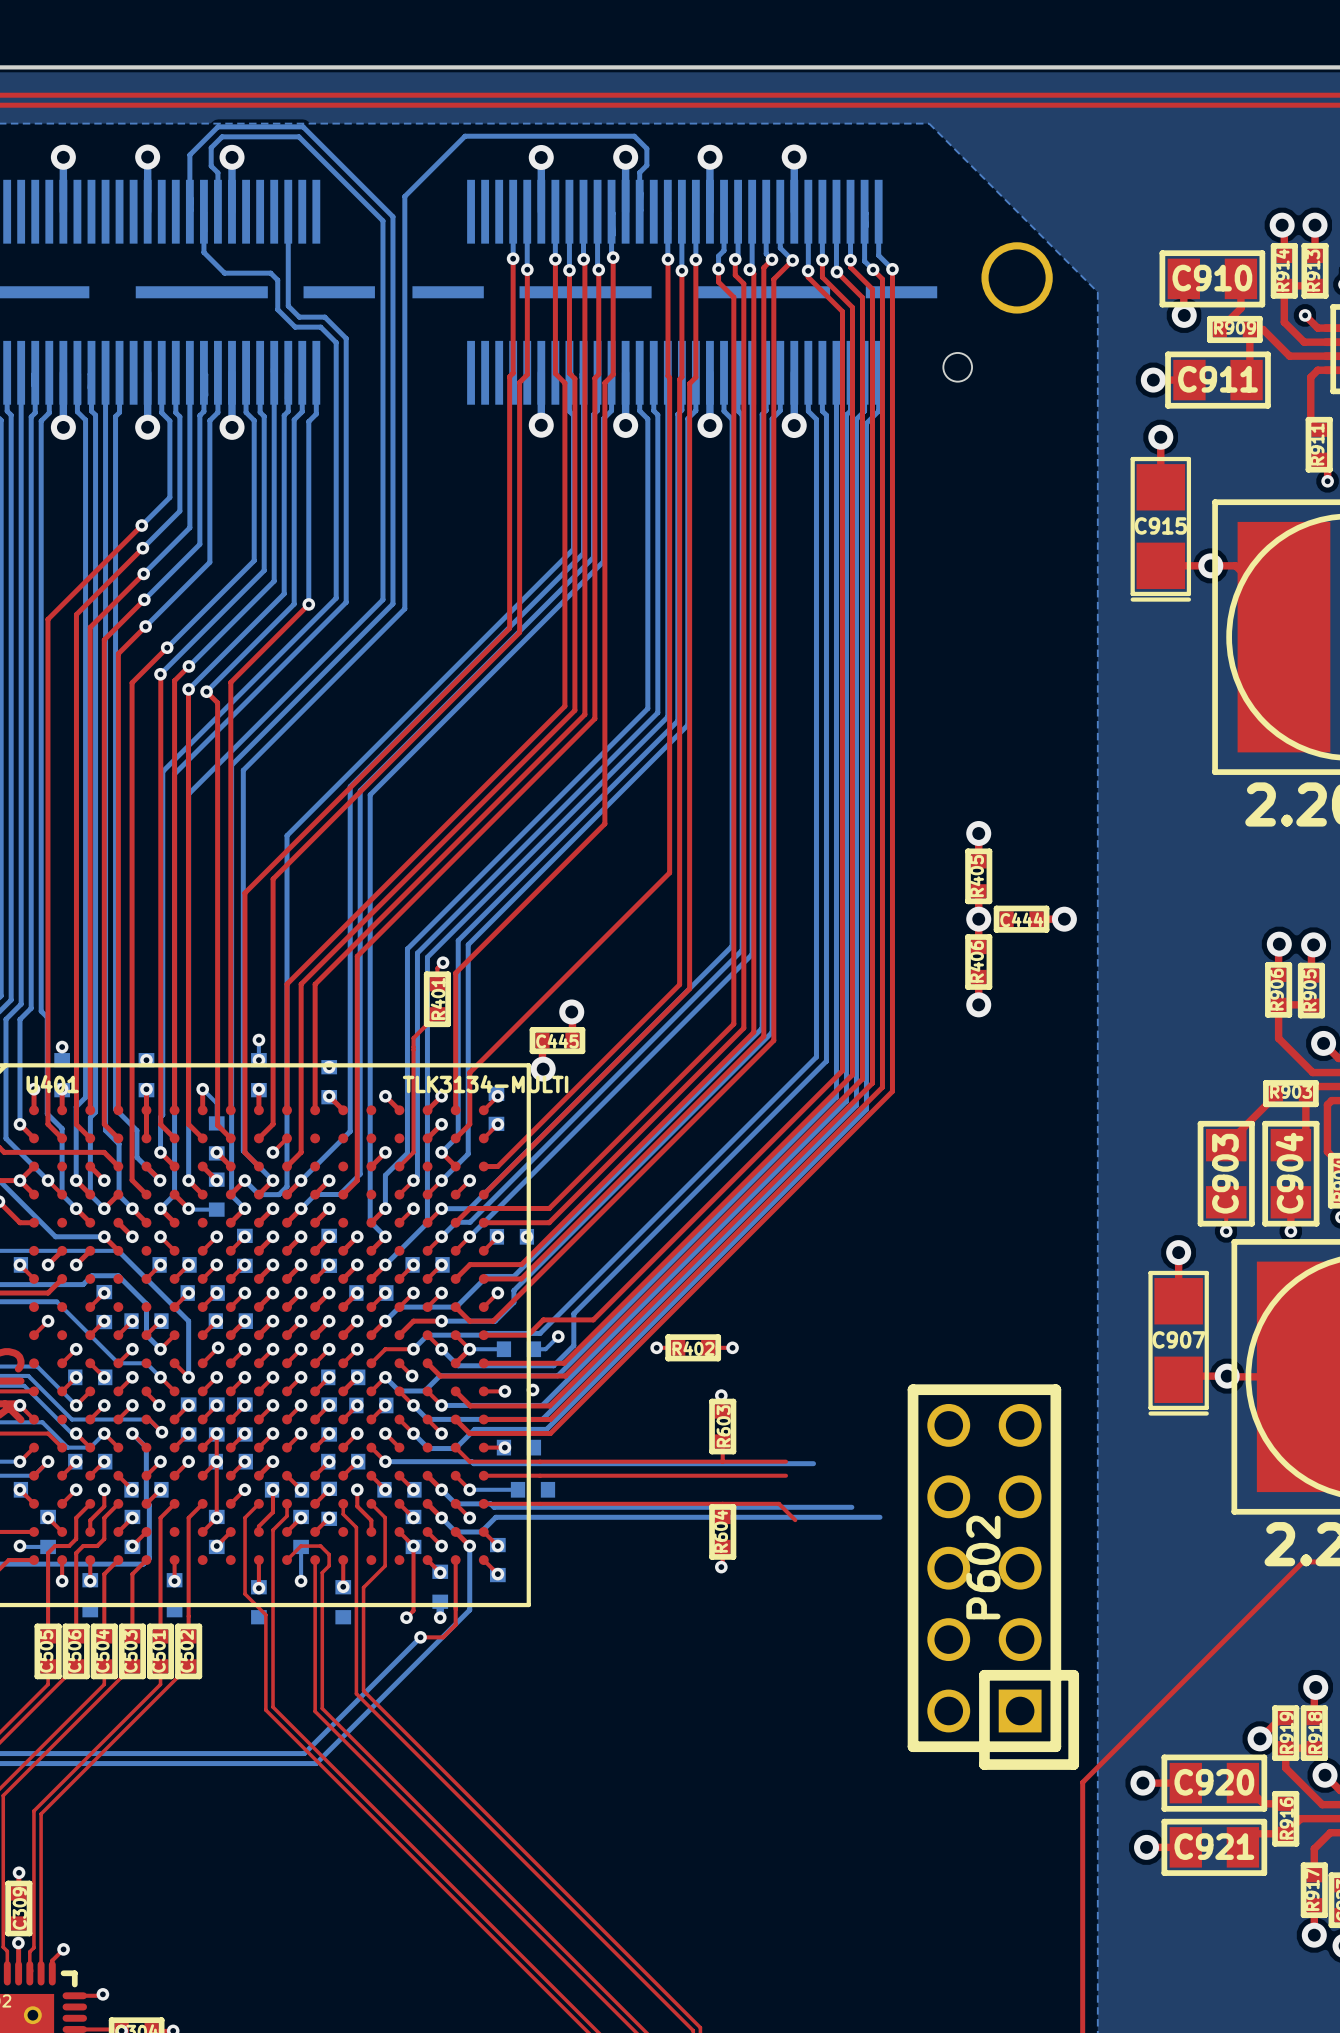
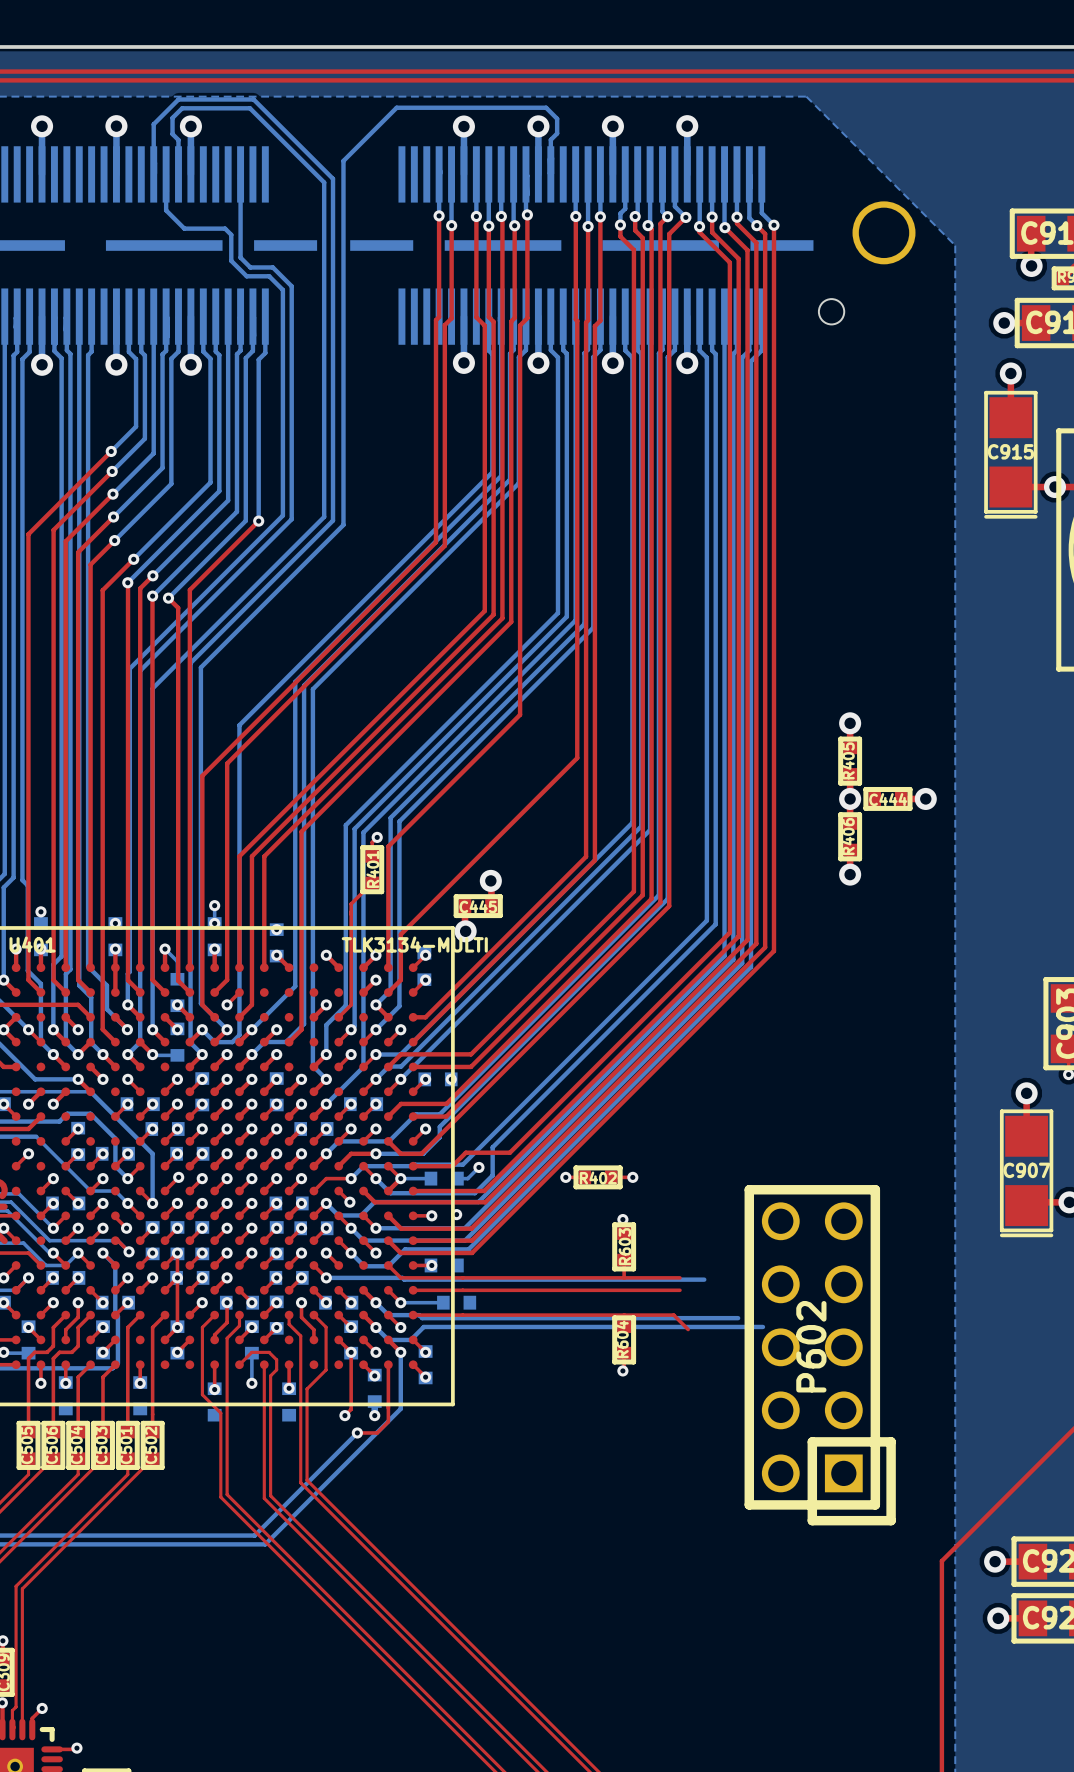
P602 position: (993, 1577) -> (820, 1355)

